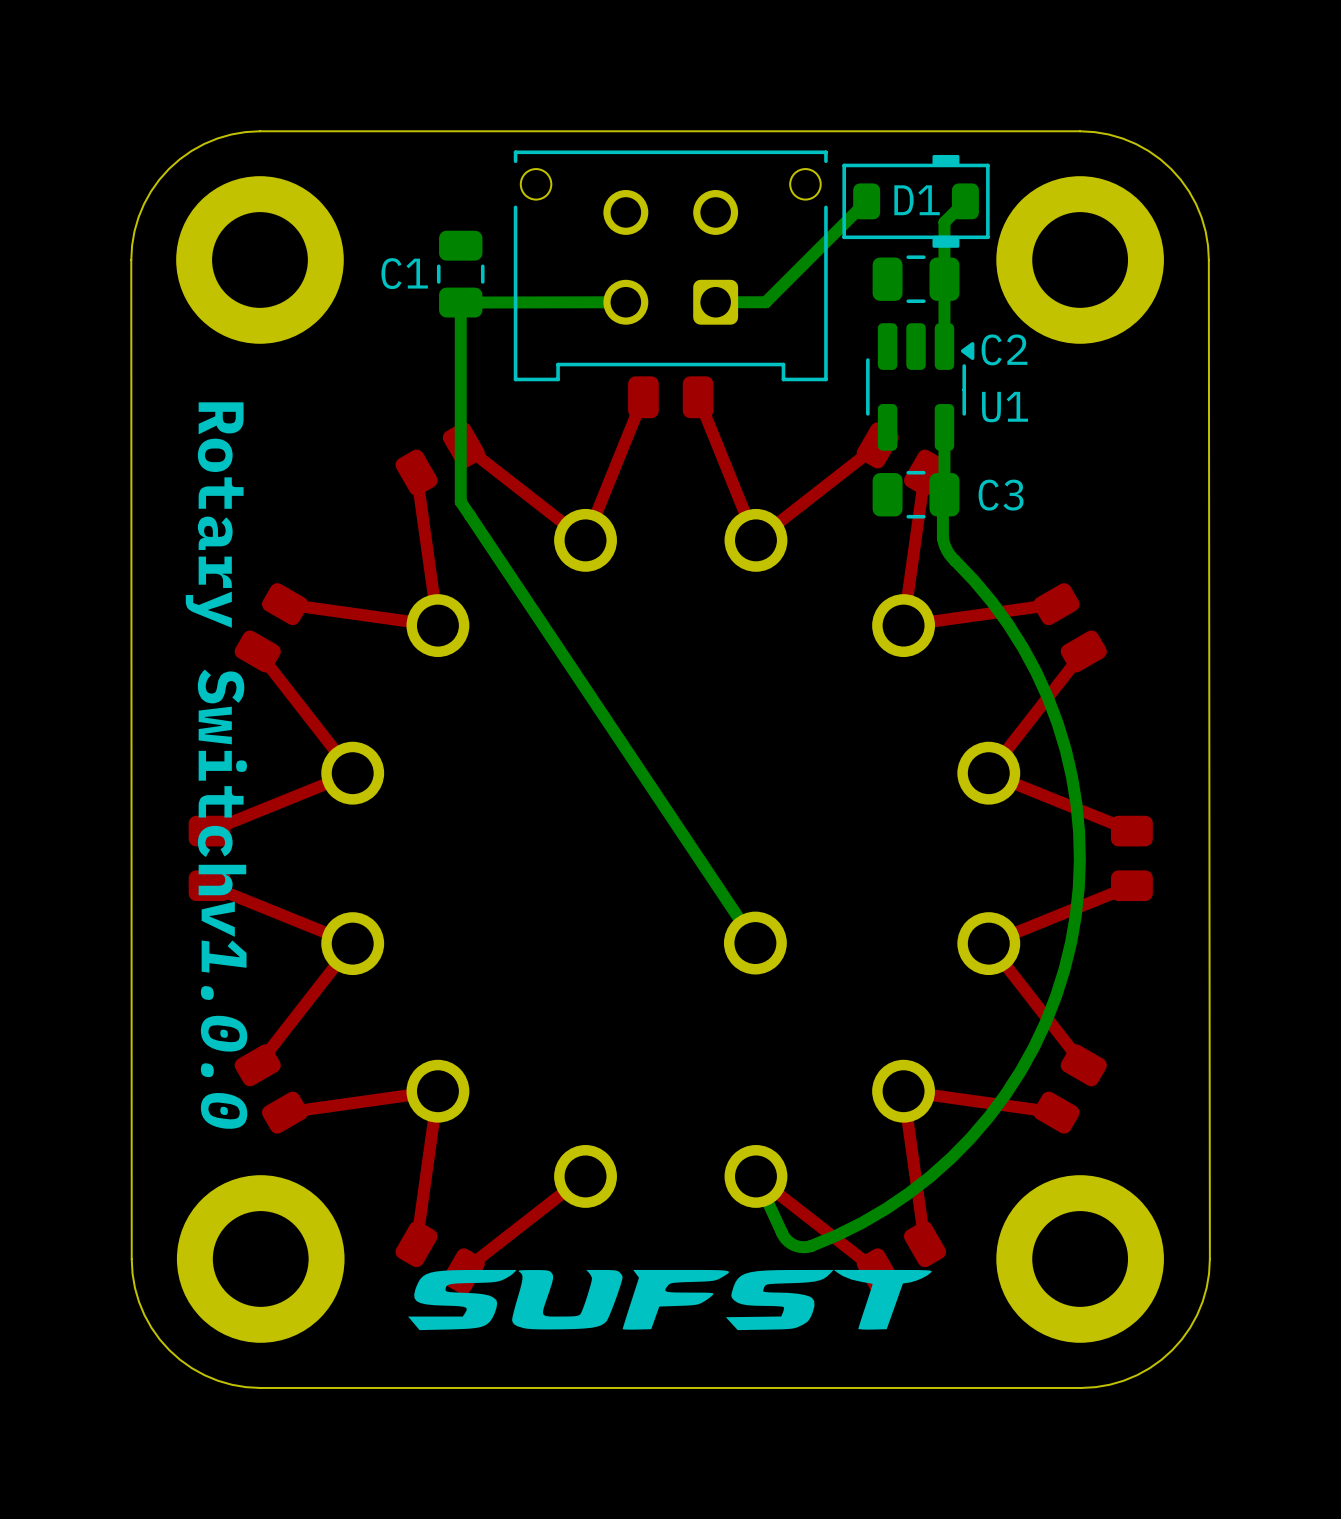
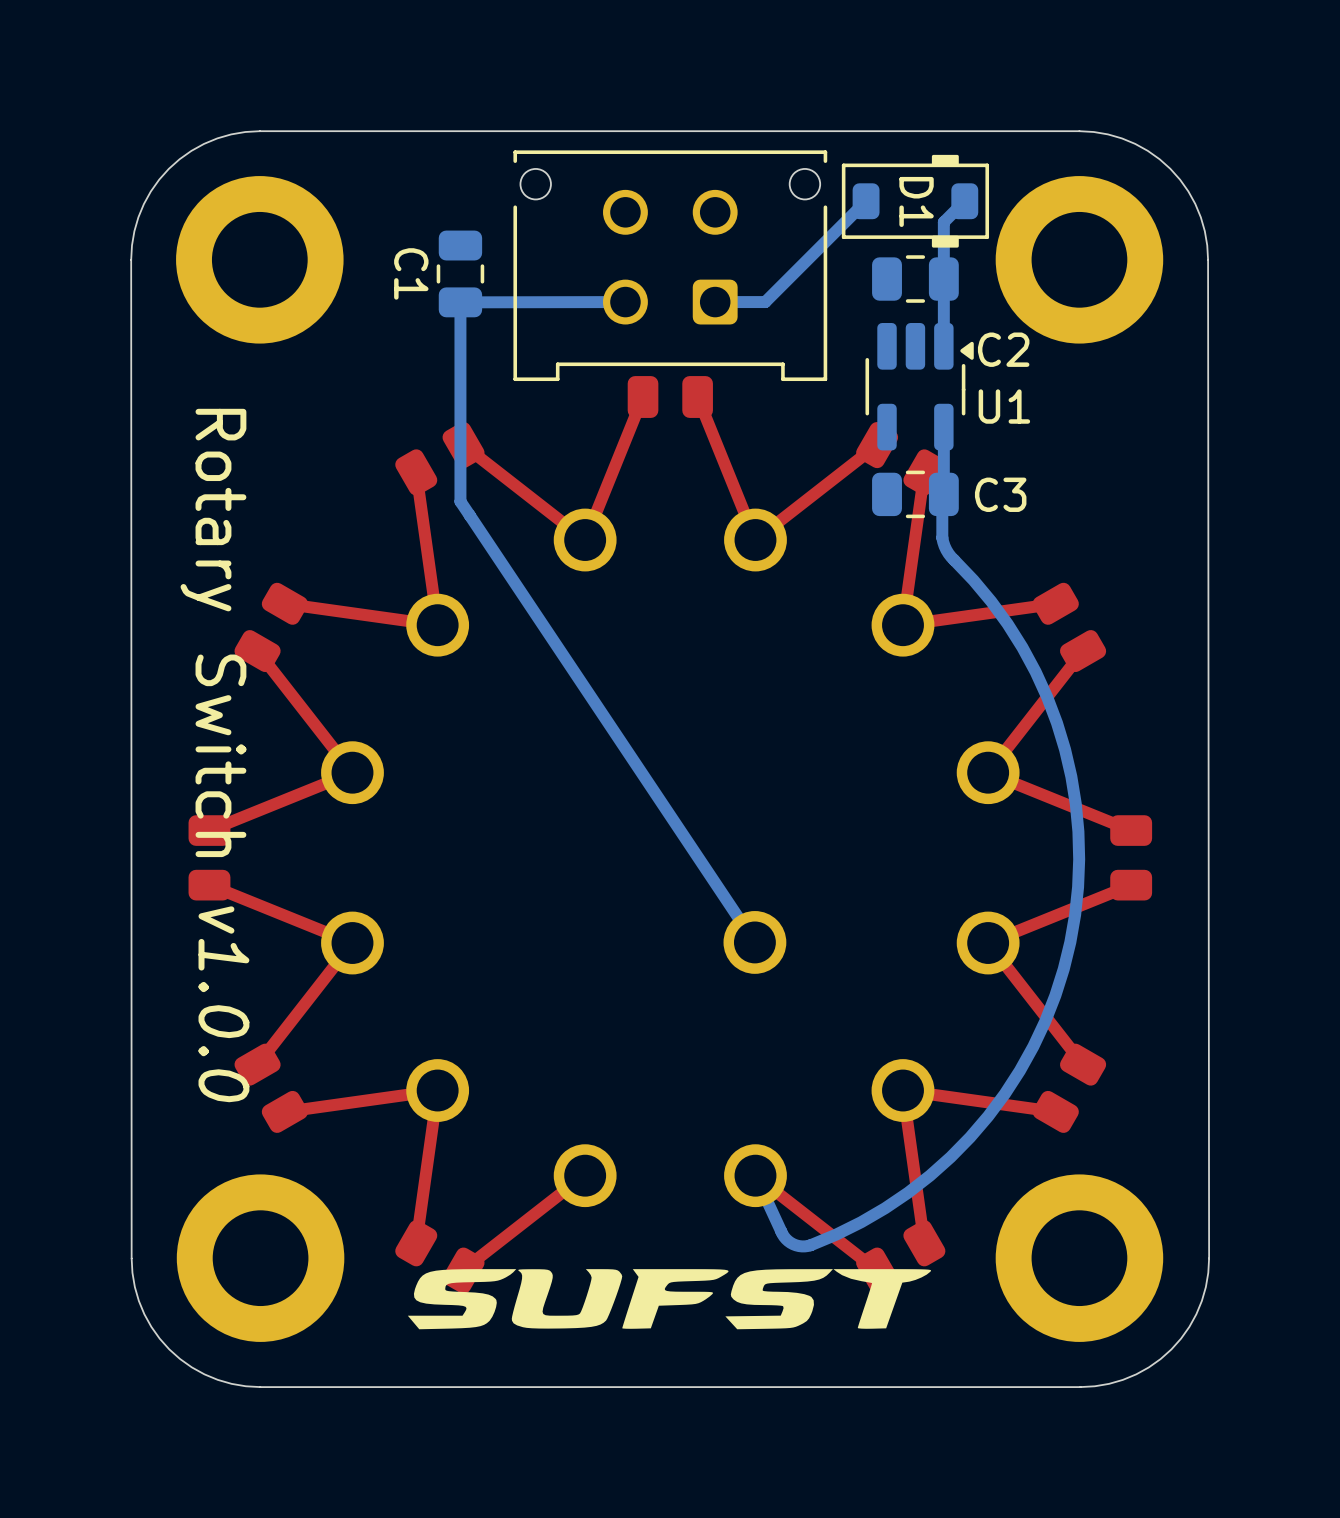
D1 name rotation: 0° (917, 200) -> 90° clockwise (916, 201)
C1 name rotation: 0° (404, 273) -> 90° clockwise (411, 273)

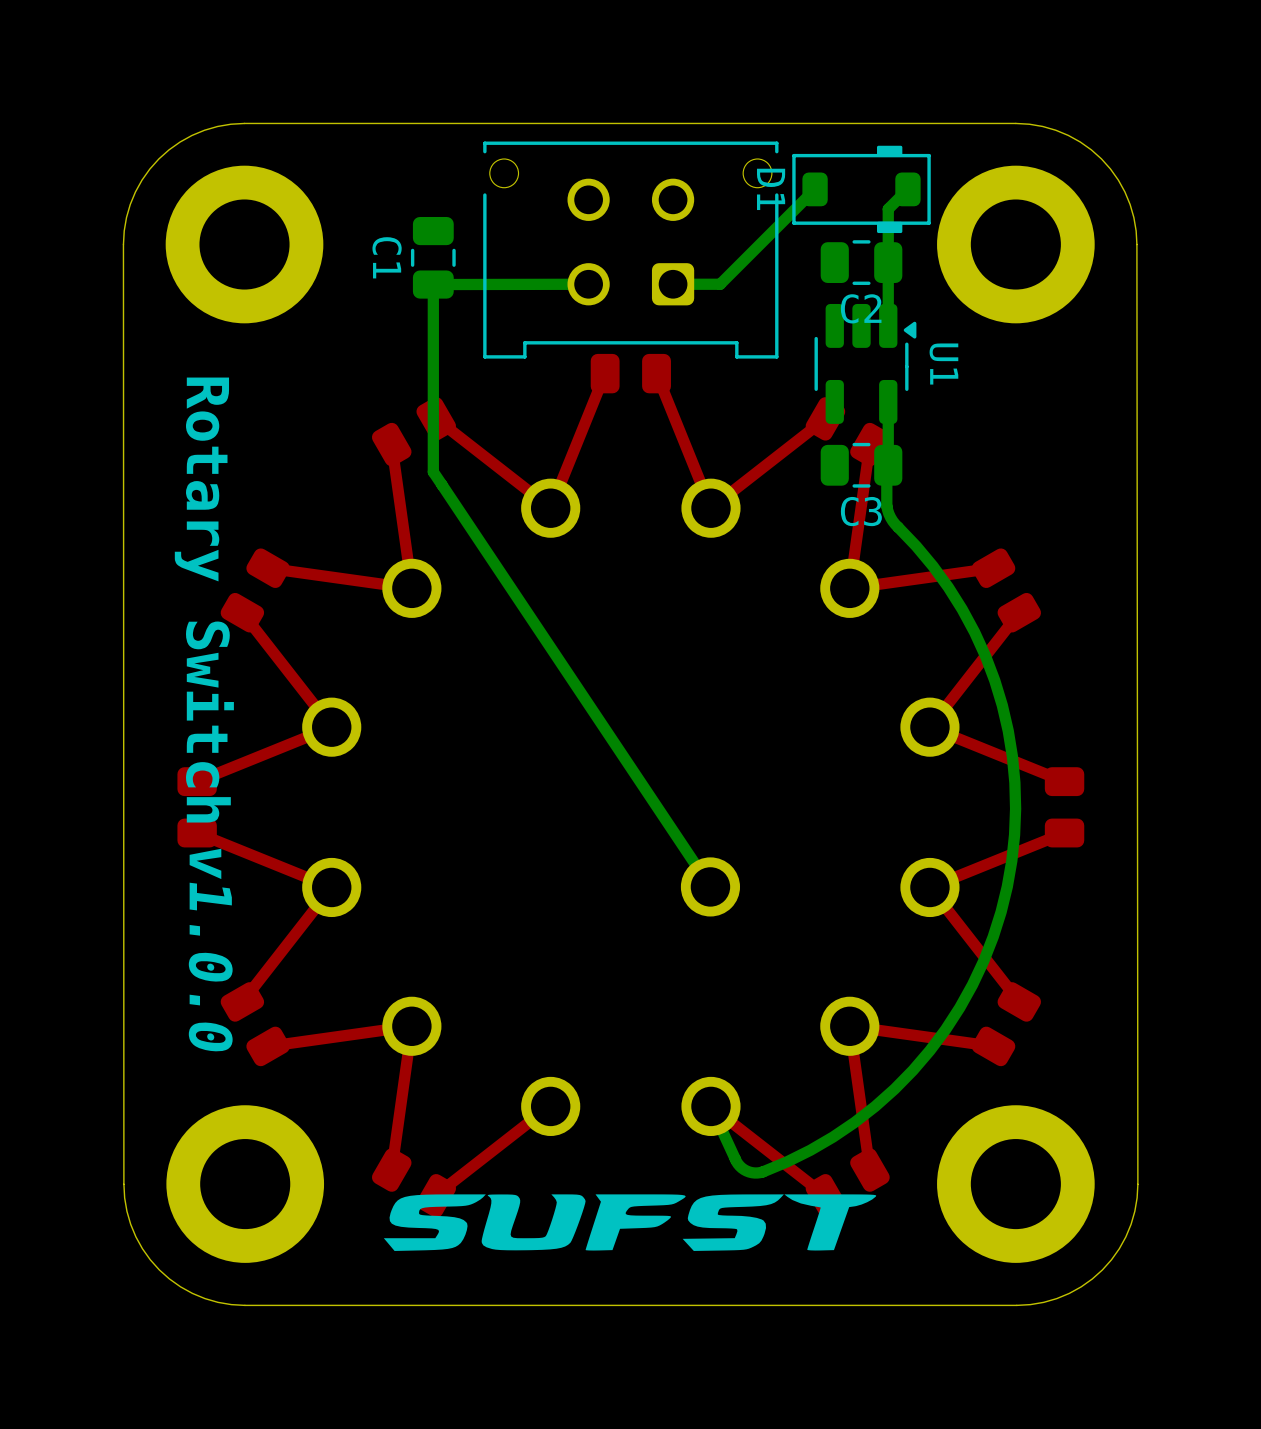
D1 name position: D1 (916, 201) -> D1 (771, 189)
C2 name position: C2 (1003, 349) -> C2 (861, 308)
U1 name rotation: 0° (1004, 406) -> 90° clockwise (943, 364)
C3 name position: C3 (1000, 494) -> C3 (861, 511)

